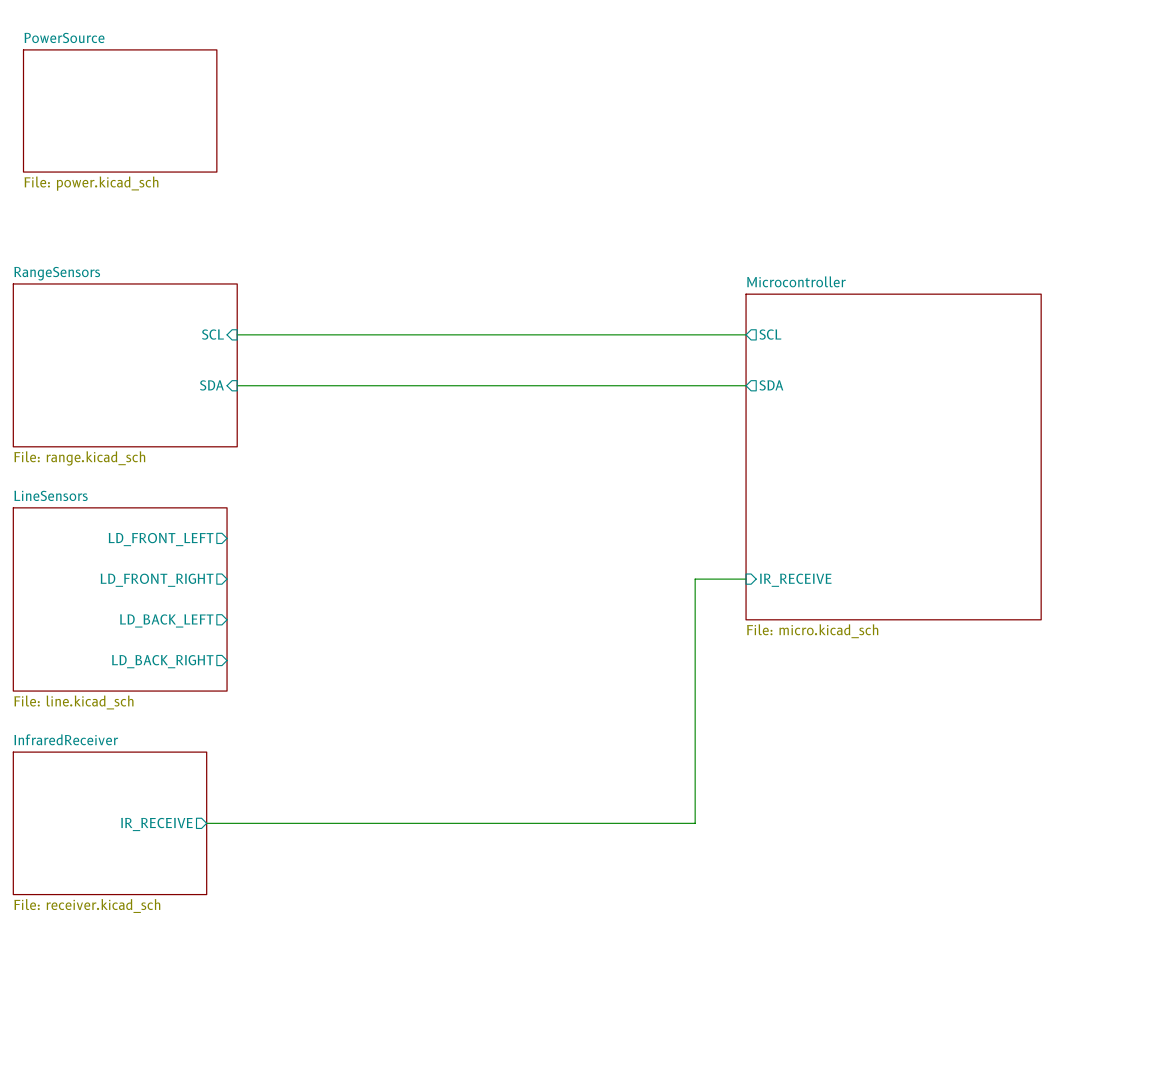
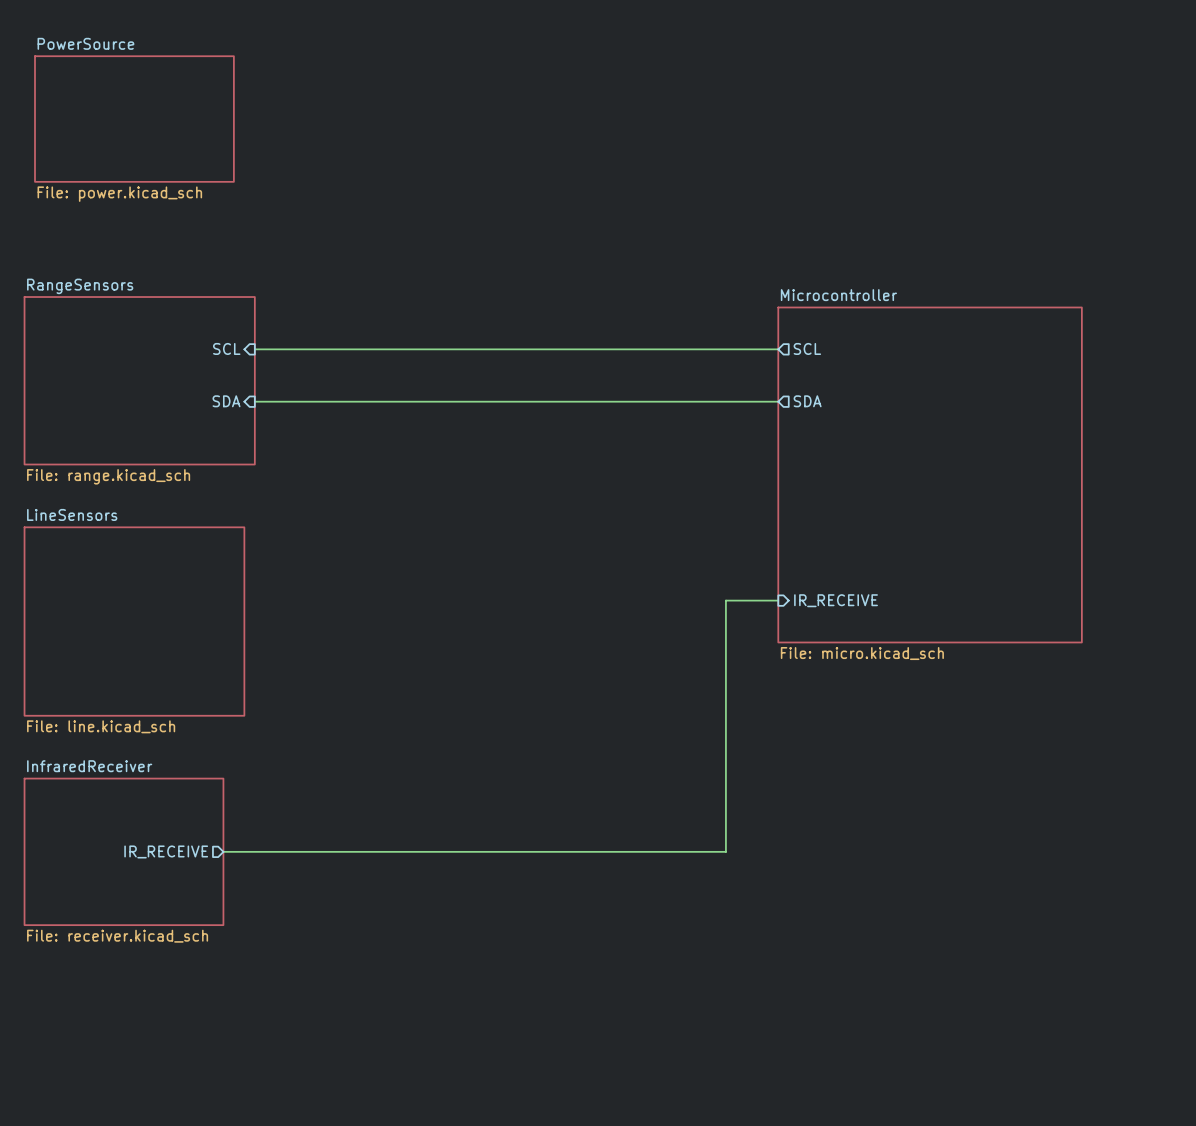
sheet pin: LD_FRONT_LEFT (161, 539) -> none
sheet pin: LD_FRONT_RIGHT (157, 580) -> none
sheet pin: LD_BACK_LEFT (166, 620) -> none
sheet pin: LD_BACK_RIGHT (162, 661) -> none

